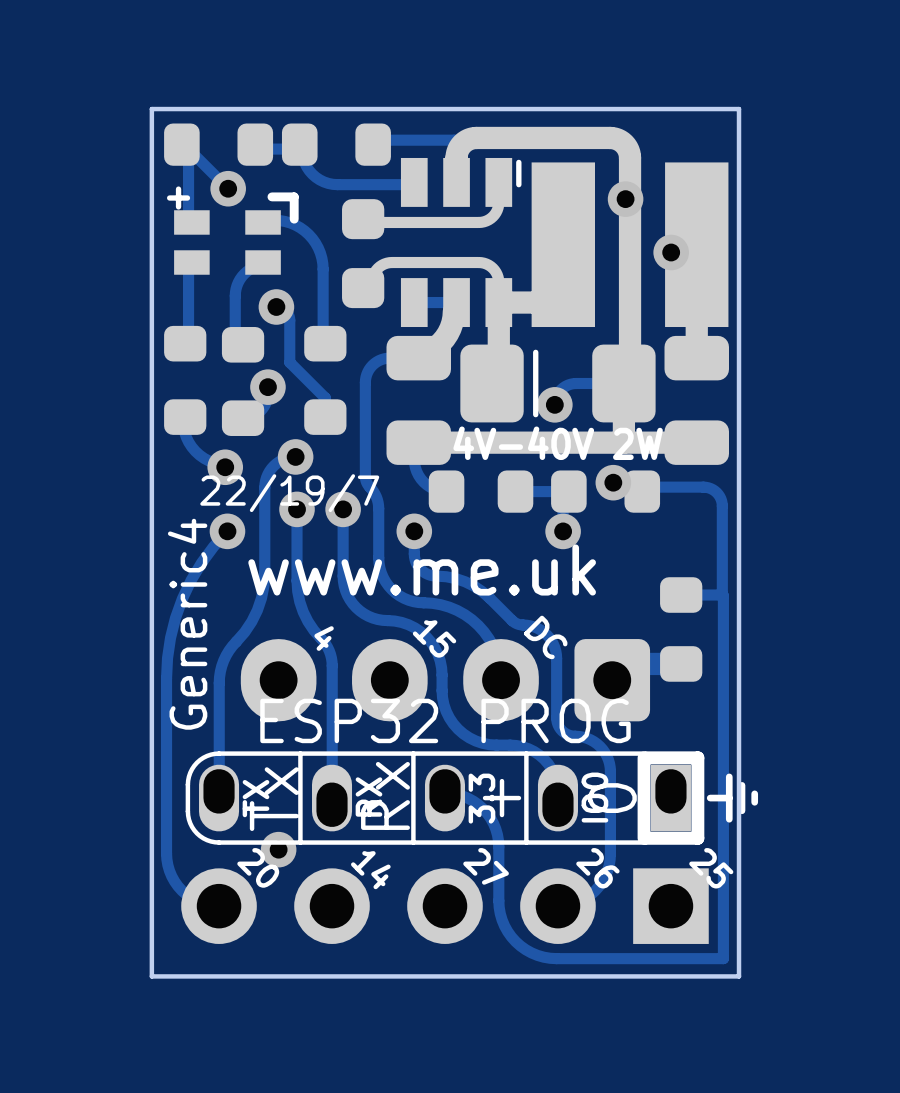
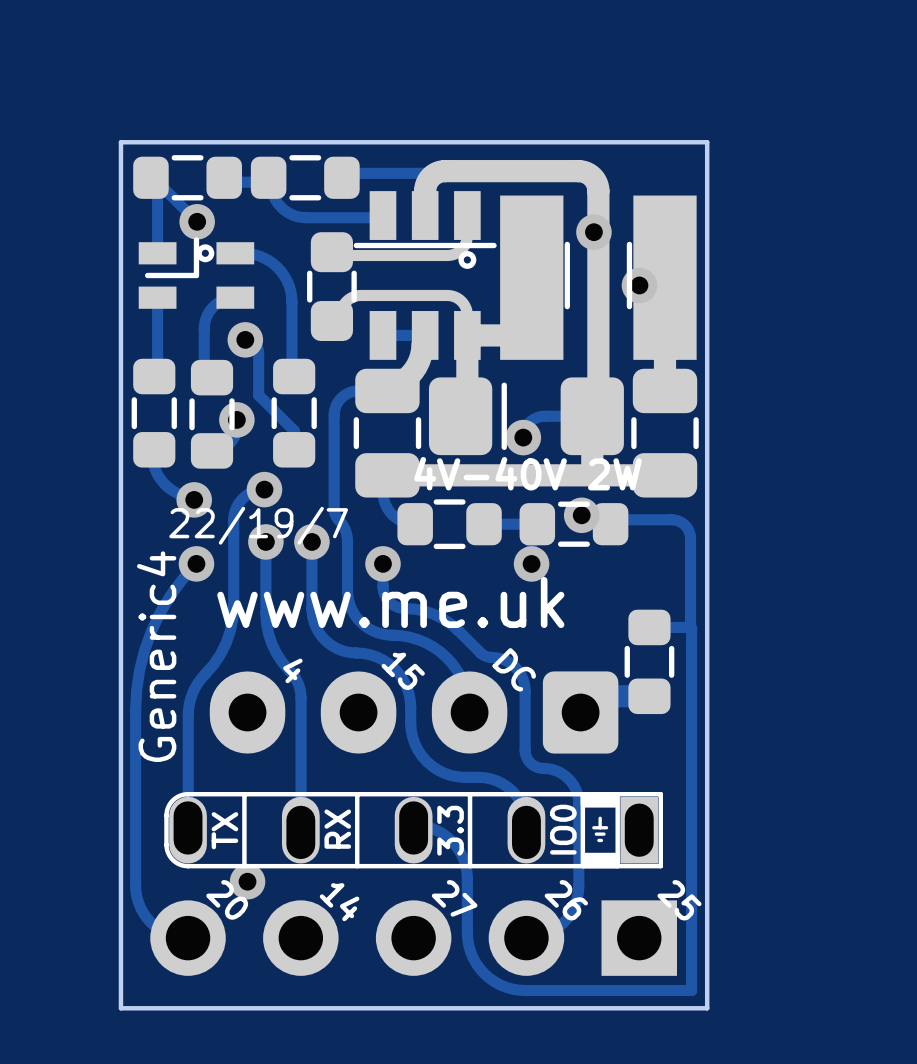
part footprint: [164, 123, 274, 166] -> [133, 155, 242, 201]
part footprint: [281, 123, 391, 166] -> [250, 155, 360, 201]
part footprint: [342, 126, 730, 465] -> [310, 160, 698, 498]
part footprint: [166, 186, 299, 275] -> [138, 237, 255, 309]
drawing: none -> [564, 241, 633, 310]
drawing: none -> [307, 270, 357, 303]
part footprint: [164, 325, 207, 435] -> [131, 358, 177, 468]
part footprint: [304, 325, 347, 435] -> [271, 358, 317, 468]
part footprint: [221, 327, 265, 436] -> [189, 359, 235, 469]
drawing: none -> [353, 417, 422, 450]
drawing: none -> [631, 417, 699, 450]
part footprint: [428, 470, 534, 513] -> [397, 499, 502, 550]
part footprint: [551, 470, 661, 513] -> [519, 501, 629, 547]
part footprint: [660, 577, 703, 682] -> [624, 609, 675, 715]
part footprint: [185, 751, 705, 845] -> [164, 791, 664, 869]

